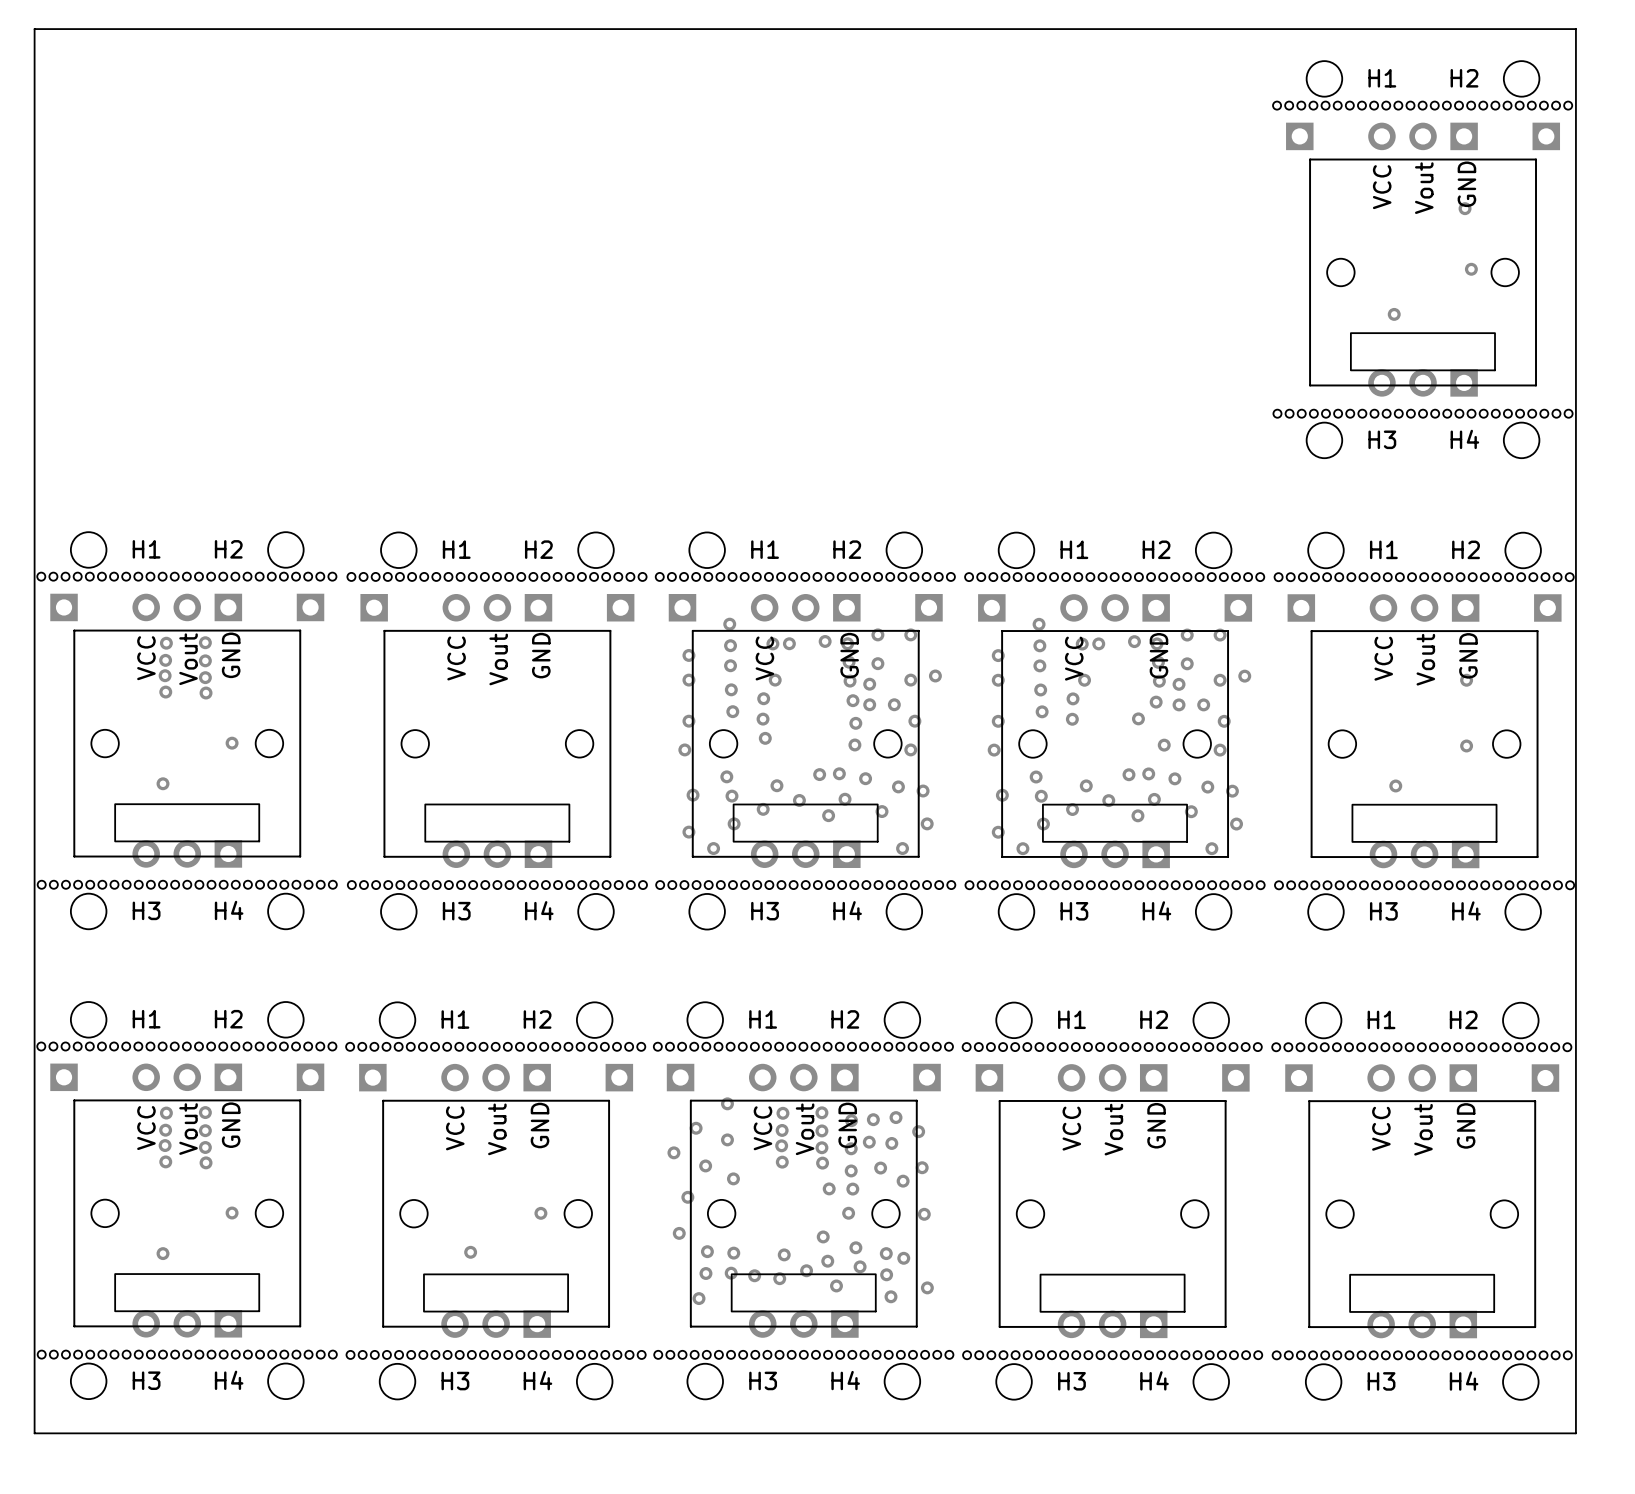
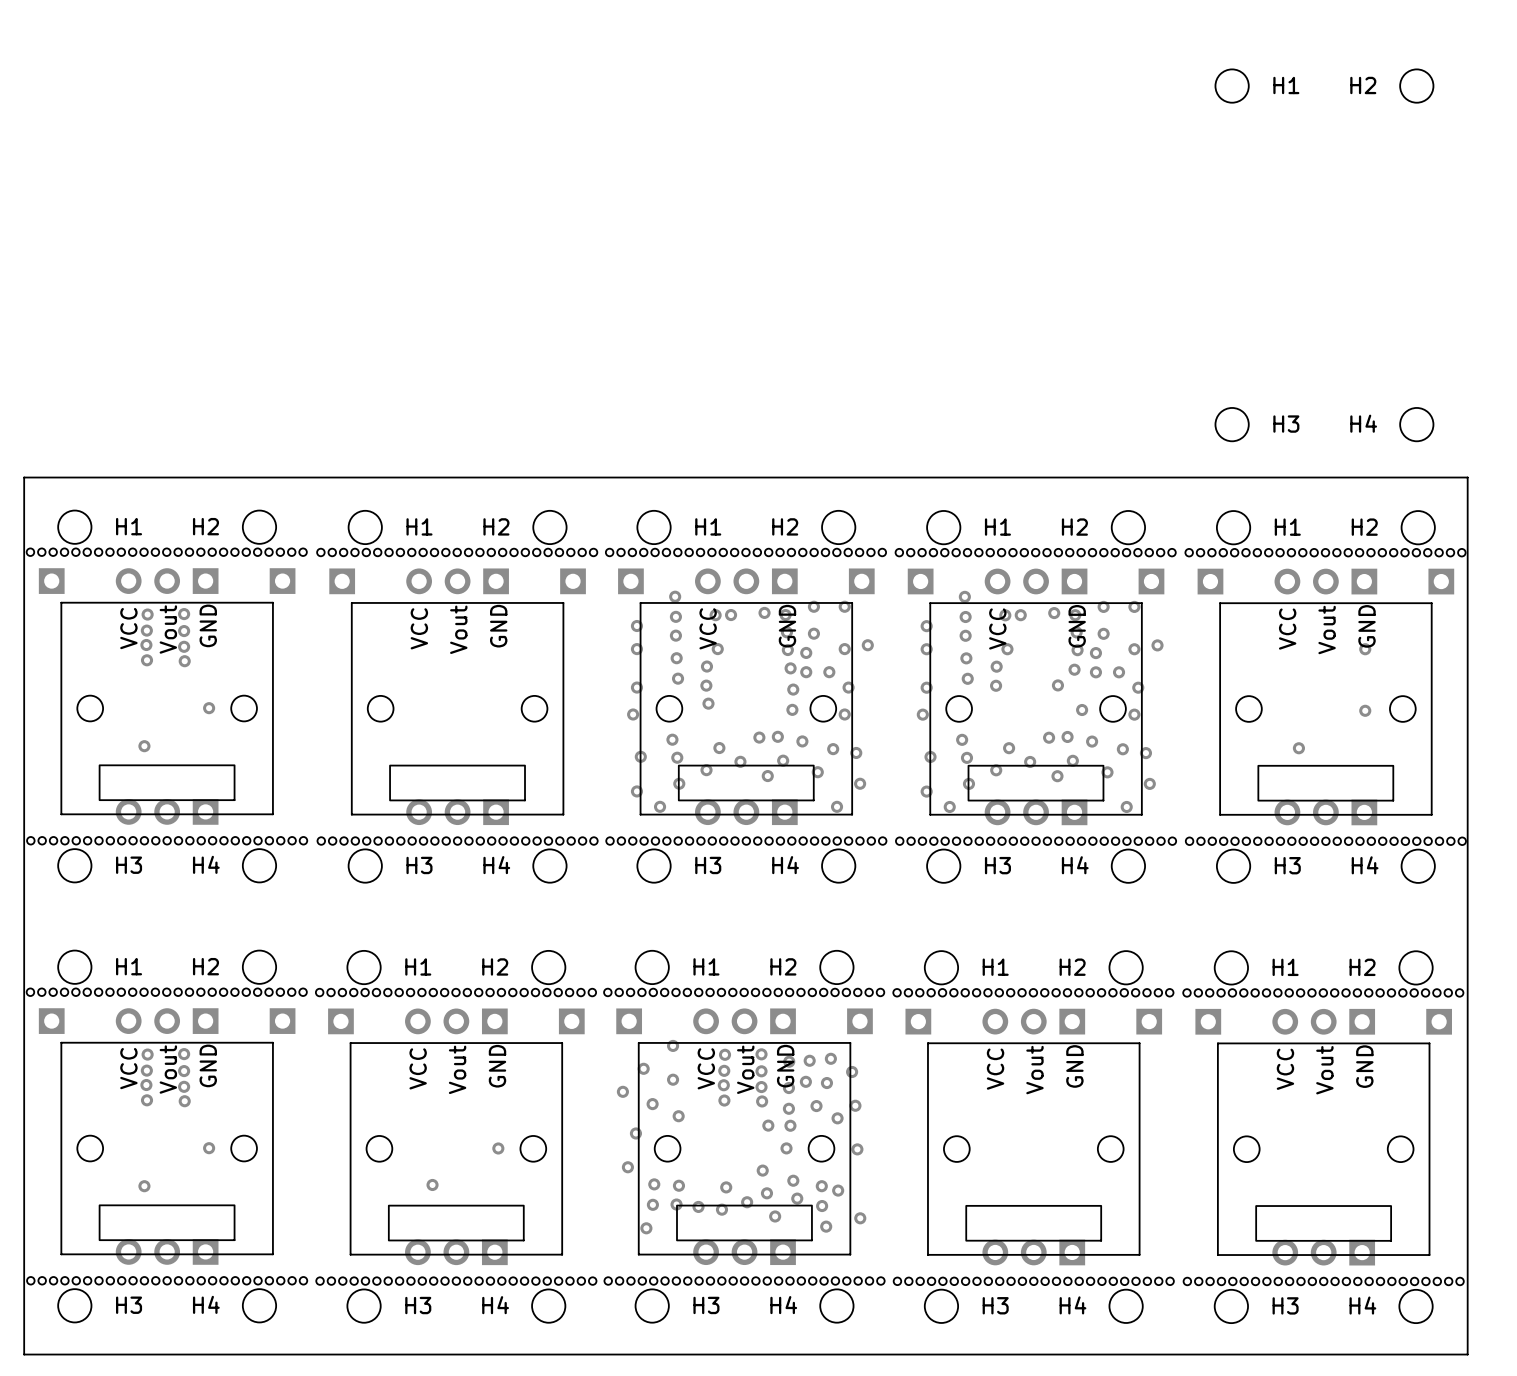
part: (1422, 105) -> none
part: (1299, 136) -> none
part: (1423, 136) -> none
part: (1546, 136) -> none
text: GND (1466, 184) -> none
text: VCC (1382, 187) -> none
text: Vout (1424, 188) -> none
via: (1465, 208) -> none
via: (1471, 269) -> none
part: (1423, 272) -> none
via: (1394, 314) -> none
part: (1423, 382) -> none
part: (1423, 413) -> none
board edge: (34, 496) (34, 29) (1575, 29) (1575, 496) -> (24, 477) (1467, 477)

